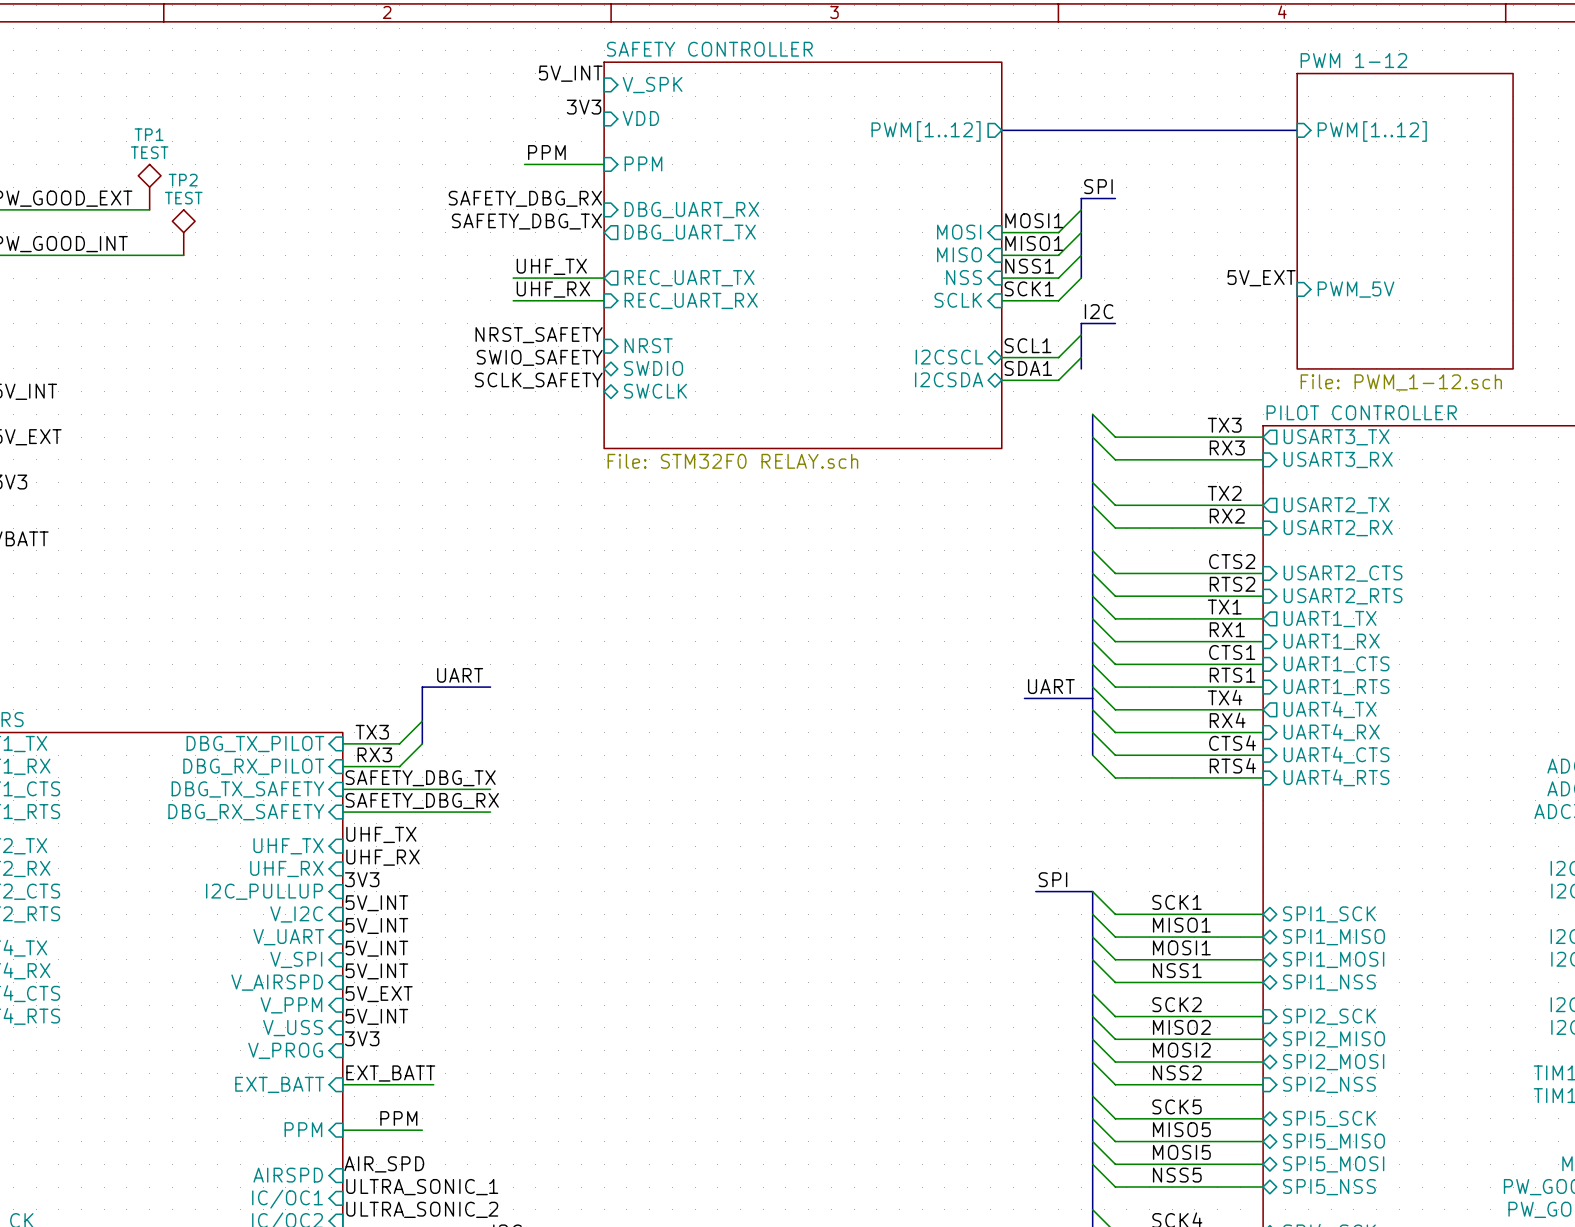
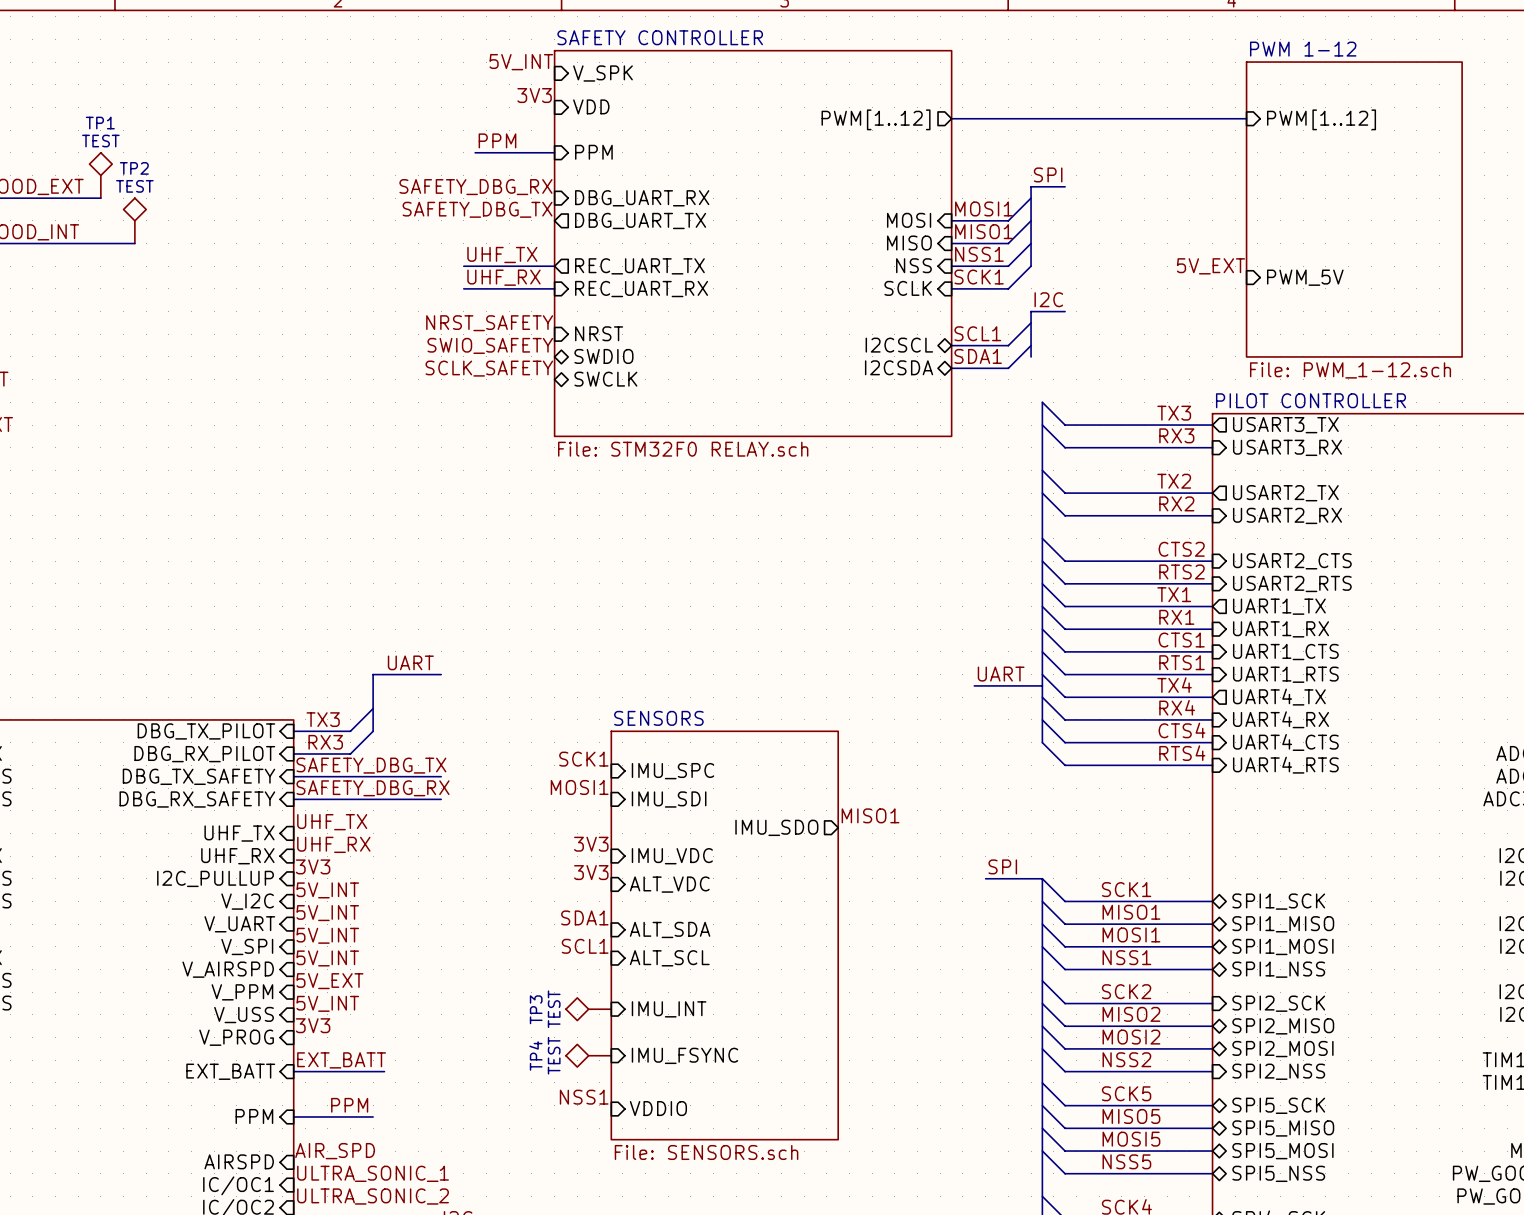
label: none -> SCK1 (583, 759)
sheet pin: none -> IMU_SPC (672, 771)
label: none -> MOSI1 (579, 787)
sheet pin: none -> IMU_SDI (669, 799)
label: none -> MISO1 (870, 815)
sheet pin: none -> IMU_SDO (776, 827)
label: none -> 3V3 (591, 844)
sheet pin: none -> IMU_VDC (672, 856)
label: none -> 3V3 (591, 872)
sheet pin: none -> ALT_VDC (669, 884)
label: none -> SDA1 (584, 917)
sheet pin: none -> ALT_SDA (670, 929)
sheet SENSORS: none -> File: SENSORS.sch (724, 935)
label: none -> SCL1 (585, 946)
sheet pin: none -> ALT_SCL (669, 958)
TP3: none -> TEST (588, 1009)
sheet pin: none -> IMU_INT (669, 1009)
TP4: none -> TEST (588, 1055)
sheet pin: none -> IMU_FSYNC (684, 1055)
label: none -> NSS1 (584, 1097)
sheet pin: none -> VDDIO (658, 1108)

